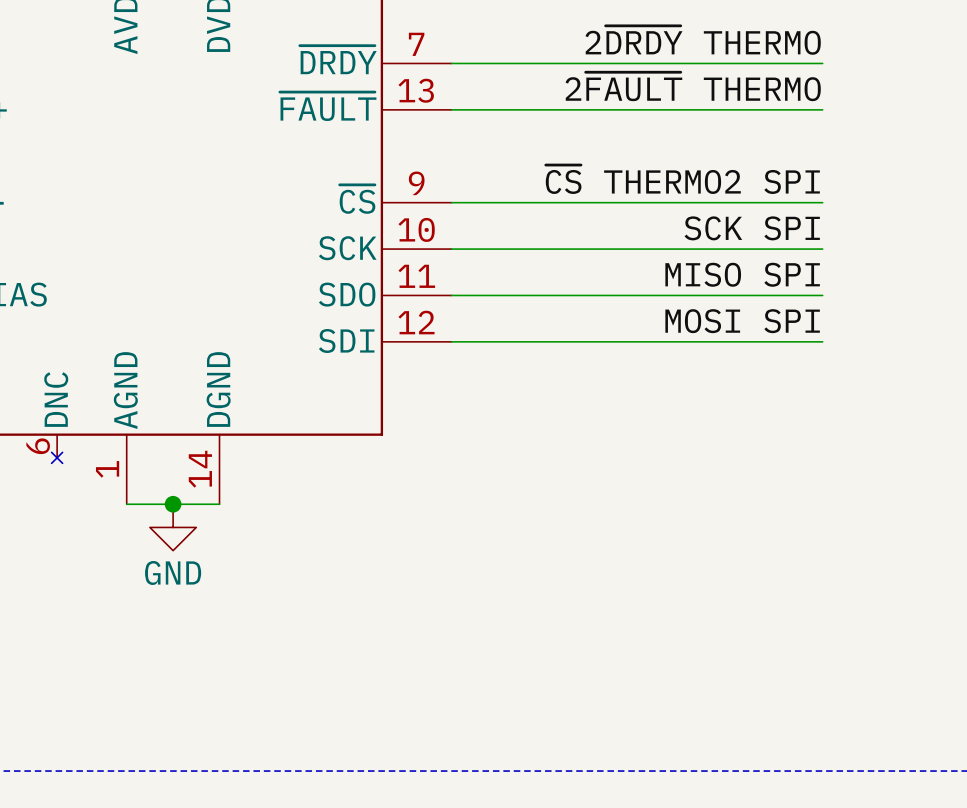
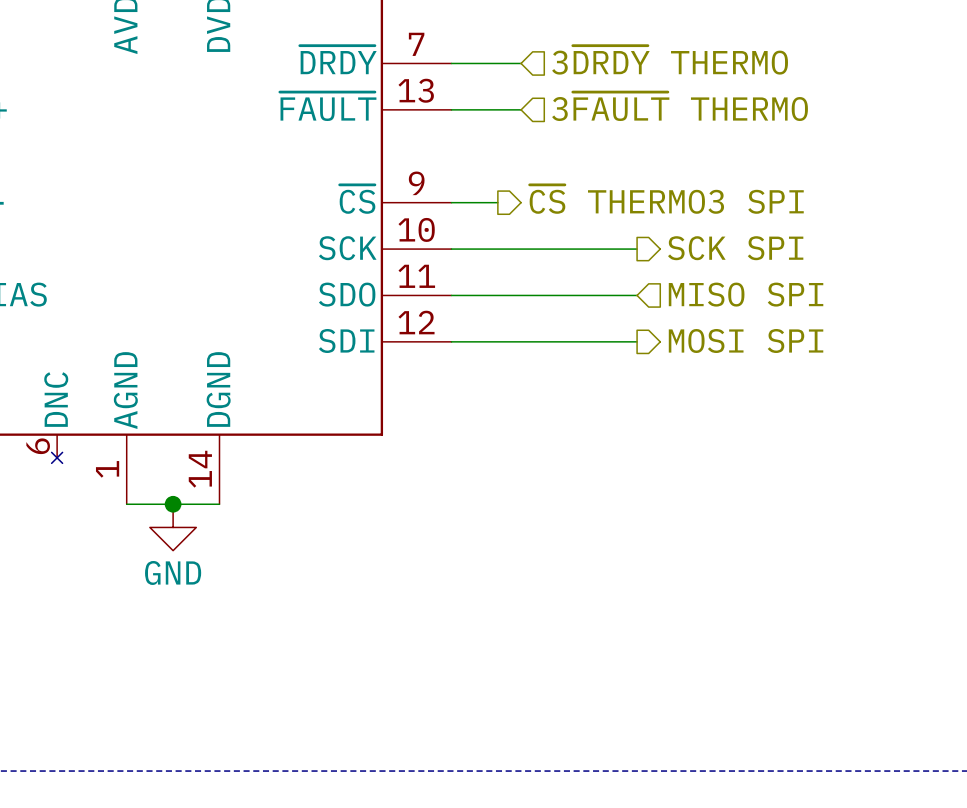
label: 2~{DRDY} THERMO (703, 40) -> none
hierarchical label: none -> 3~{DRDY} THERMO (670, 60)
wire: (521, 63) (822, 63) -> none
label: 2~{FAULT} THERMO (693, 86) -> none
hierarchical label: none -> 3~{FAULT} THERMO (680, 106)
wire: (521, 109) (822, 109) -> none
label: ~{CS} THERMO2 SPI (682, 179) -> none
hierarchical label: none -> ~{CS} THERMO3 SPI (666, 199)
wire: (497, 202) (822, 202) -> none
label: SCK SPI (752, 228) -> none
hierarchical label: none -> SCK SPI (735, 248)
wire: (637, 249) (822, 249) -> none
label: MISO SPI (742, 274) -> none
hierarchical label: none -> MISO SPI (746, 294)
wire: (637, 295) (822, 295) -> none
label: MOSI SPI (742, 321) -> none
hierarchical label: none -> MOSI SPI (746, 340)
wire: (637, 341) (822, 341) -> none

